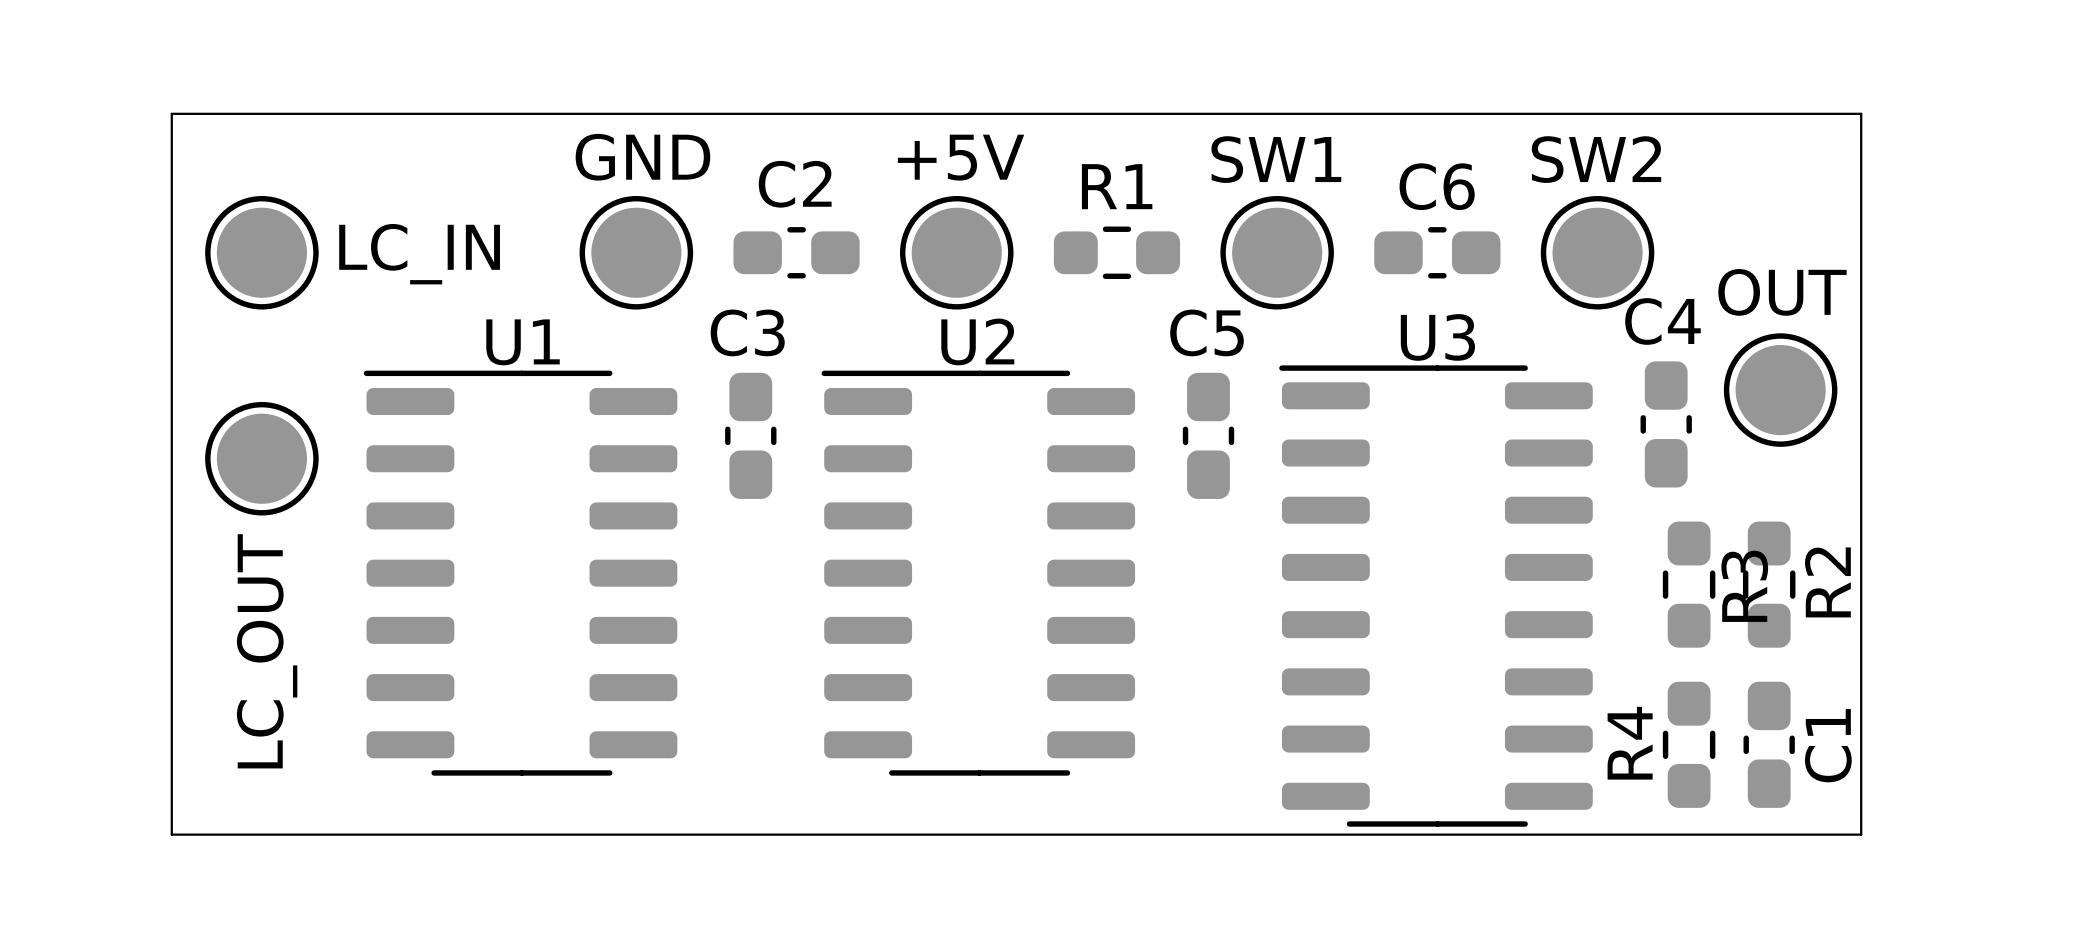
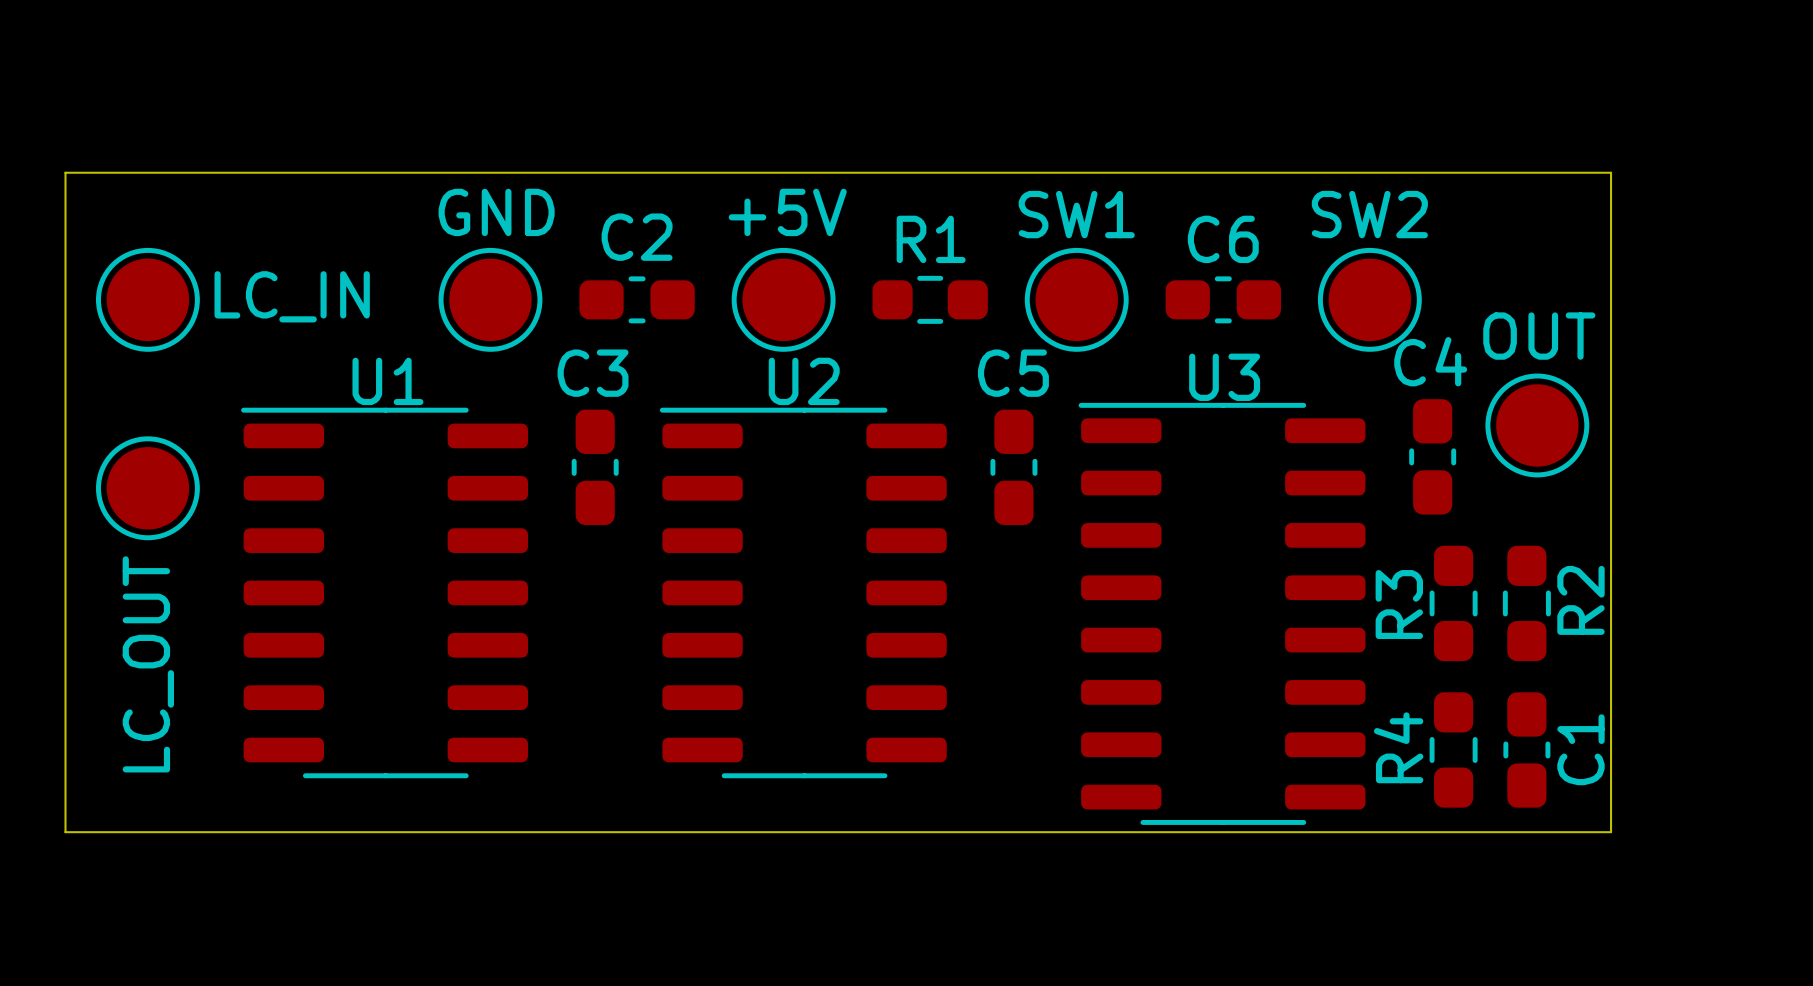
R3 name position: R3 (1744, 586) -> R3 (1399, 604)

